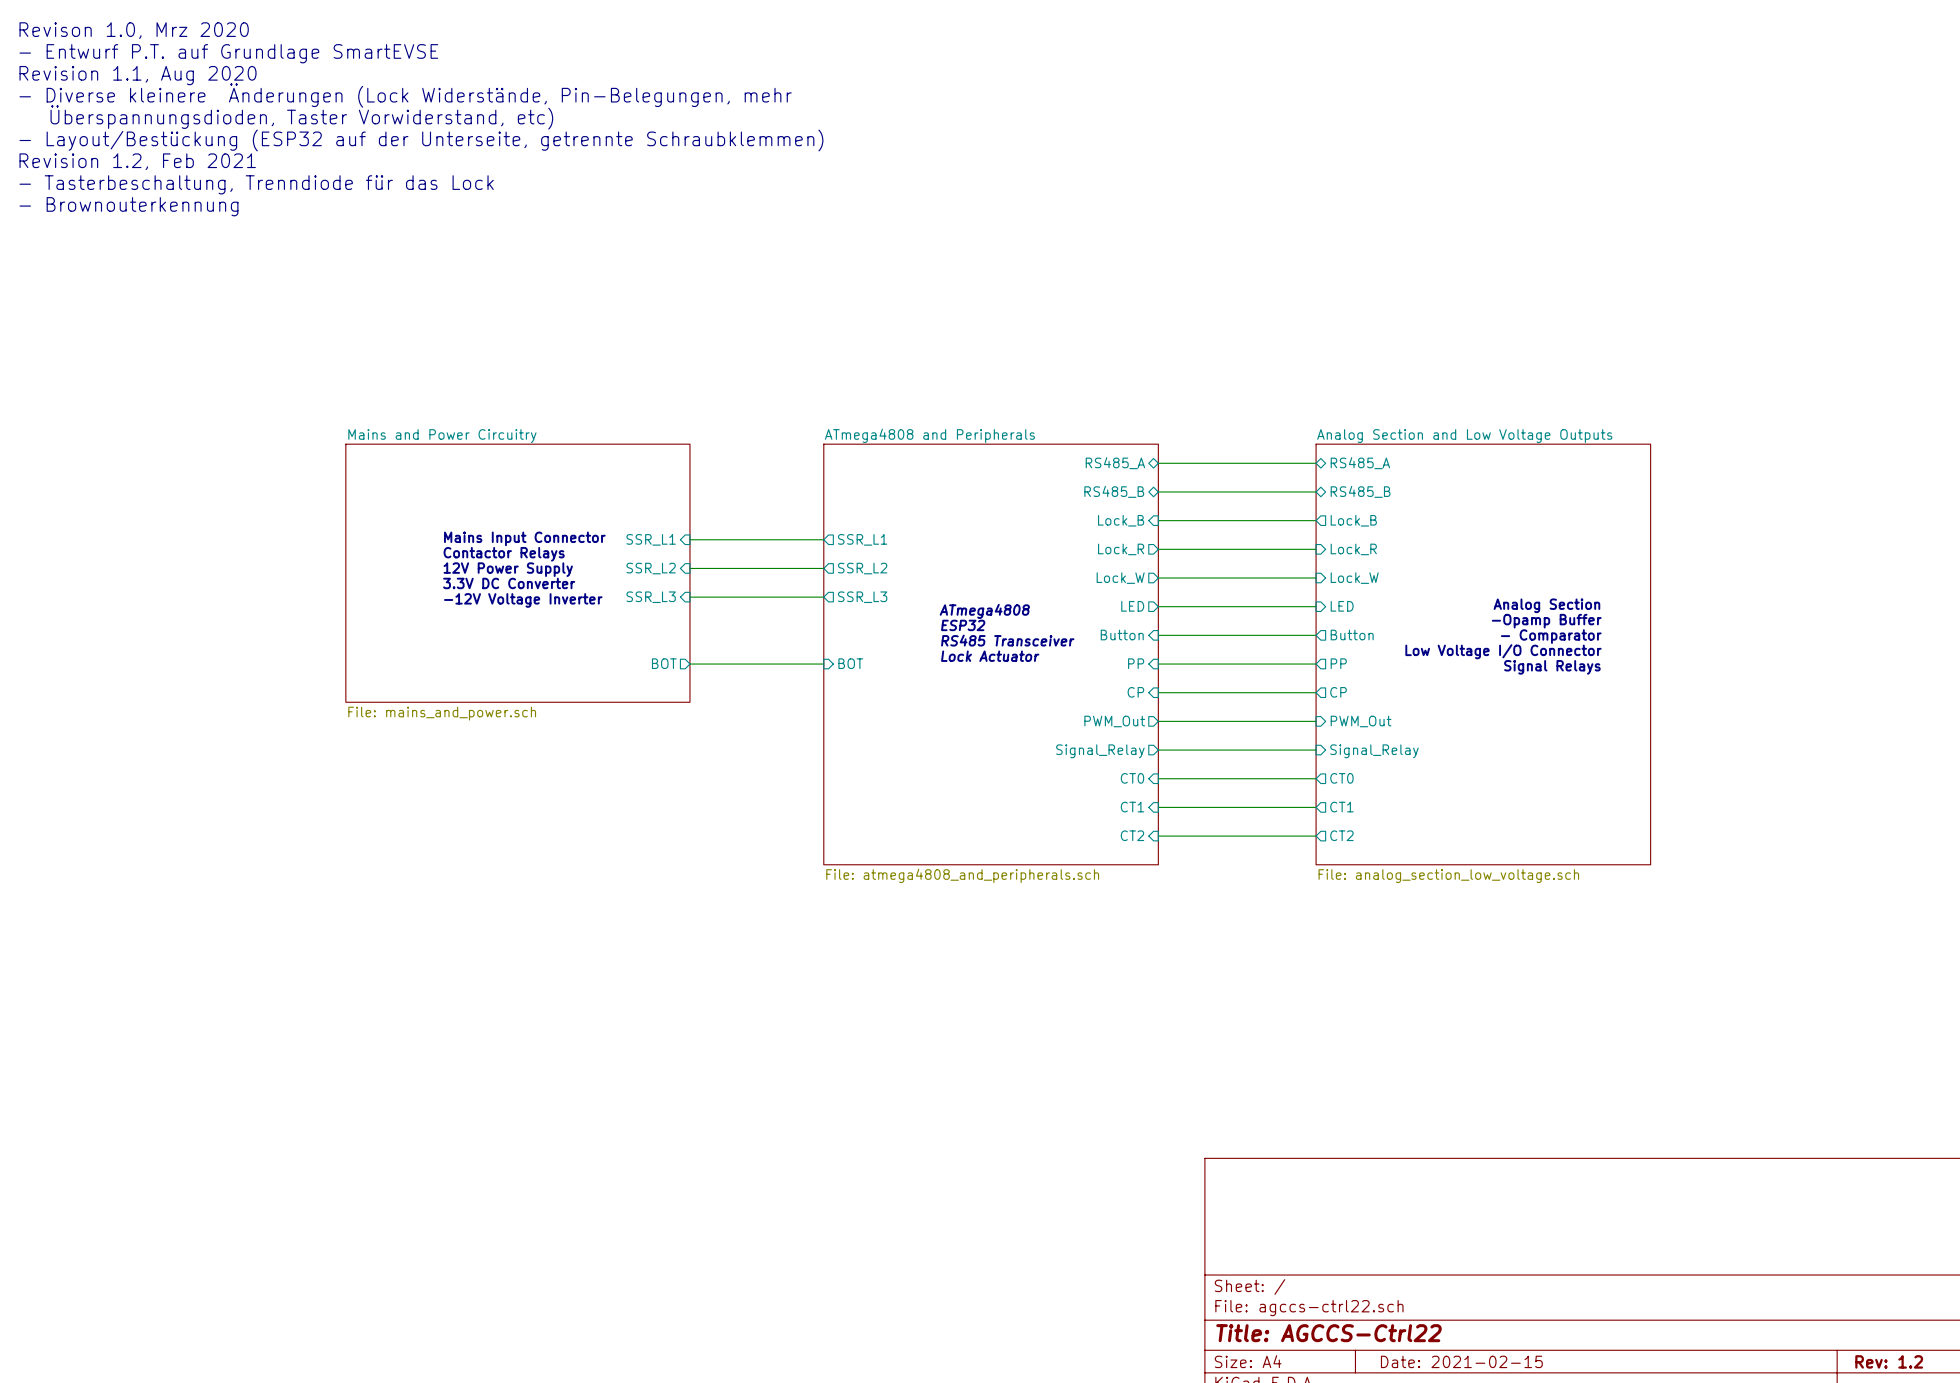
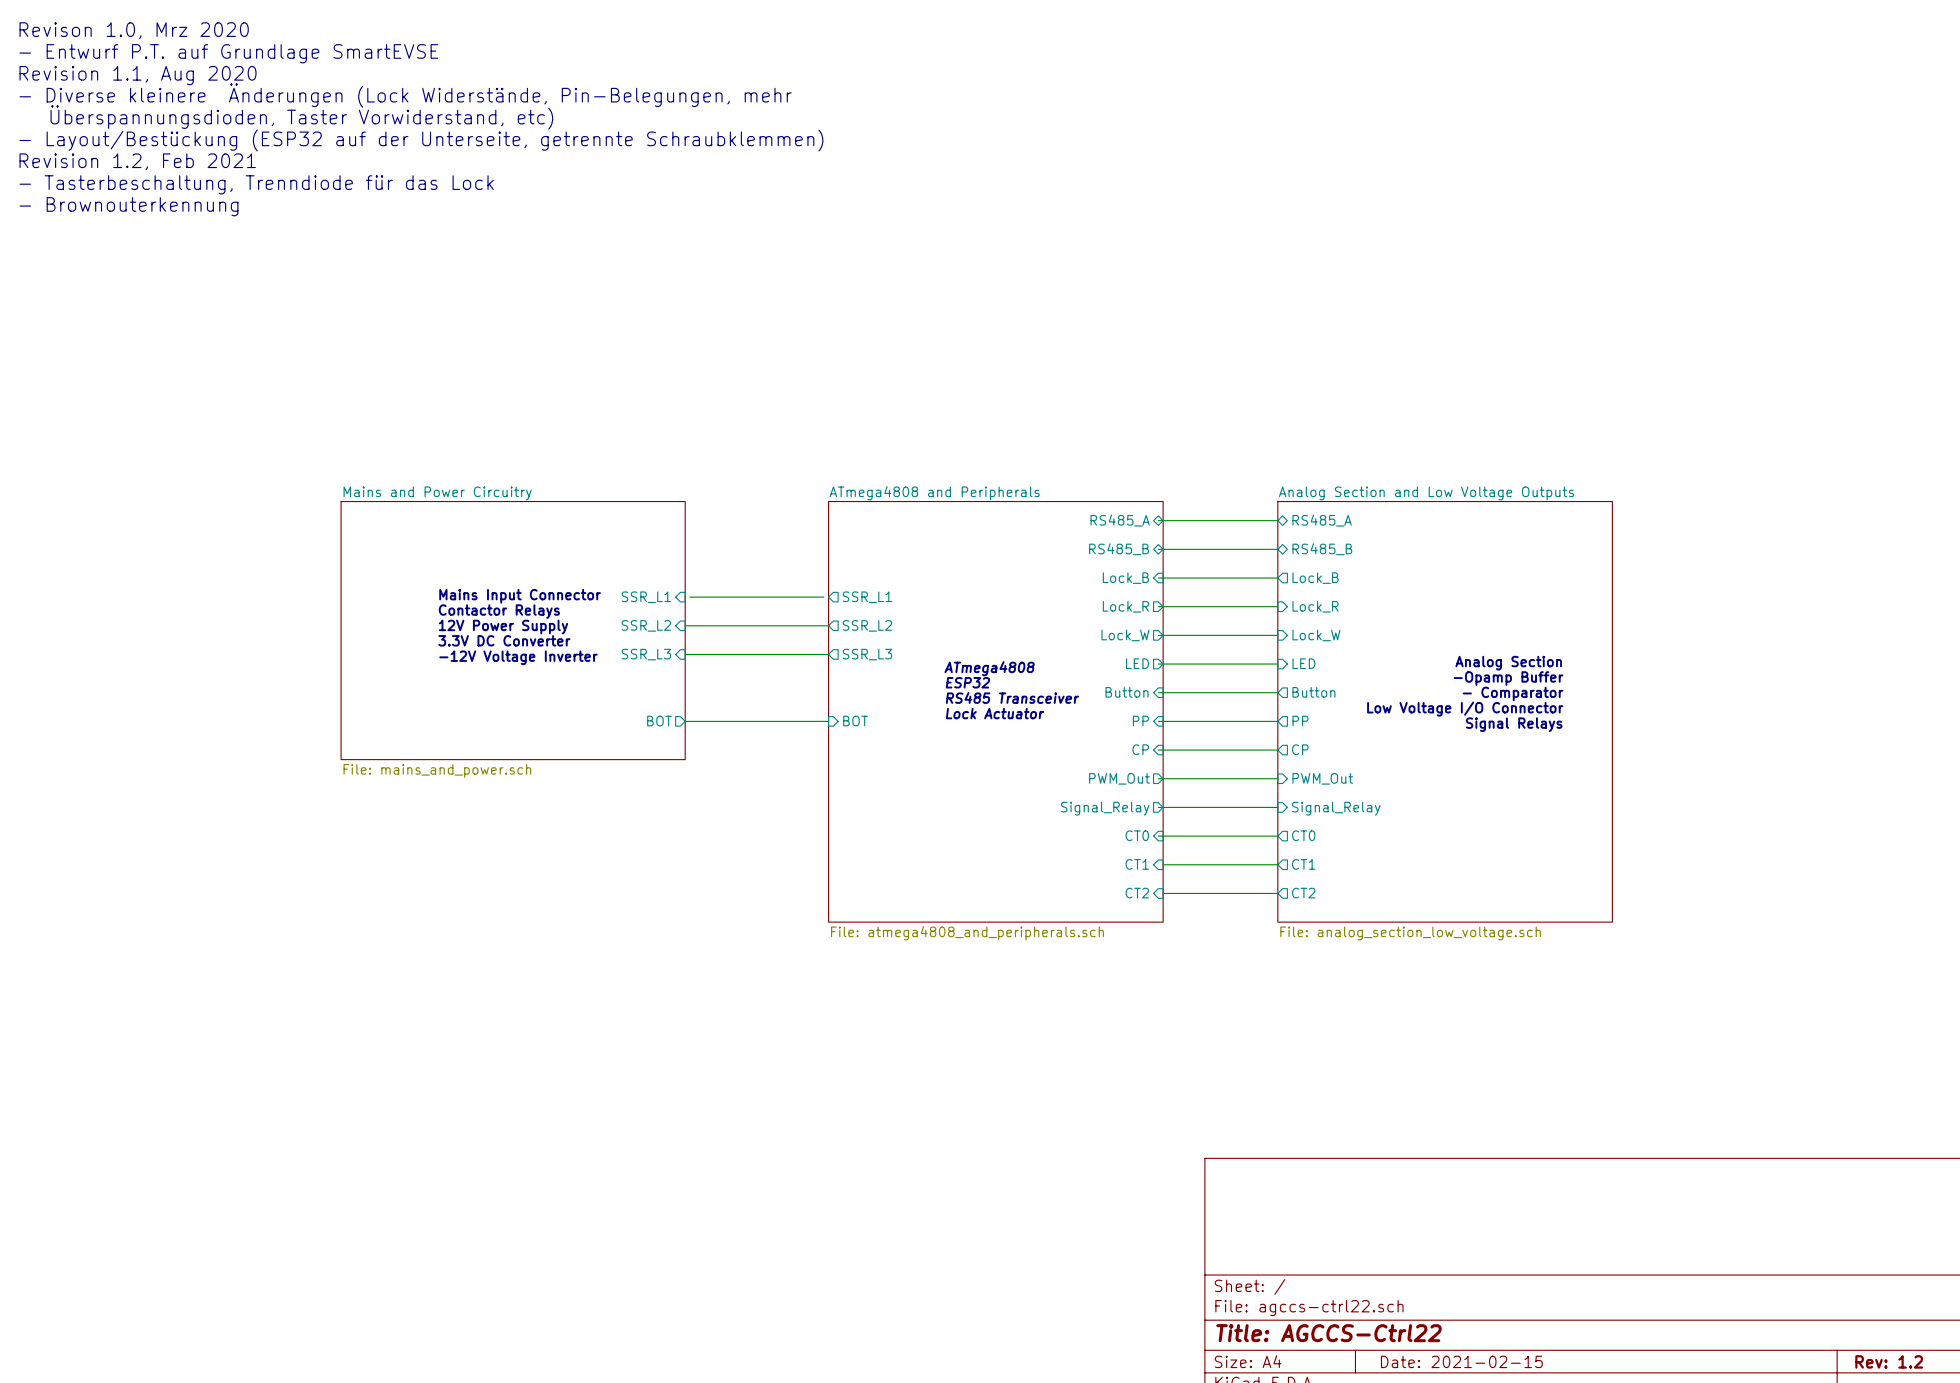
sheet pin position: RS485_A (1115, 463) -> RS485_A (1120, 520)
wire: (1158, 463) (1316, 463) -> none
sheet pin position: RS485_A (1360, 463) -> RS485_A (1322, 520)
sheet pin position: RS485_B (1114, 491) -> RS485_B (1119, 549)
wire: (1158, 491) (1316, 491) -> none
sheet pin position: RS485_B (1360, 491) -> RS485_B (1322, 549)
sheet pin position: Lock_B (1121, 520) -> Lock_B (1125, 578)
wire: (1277, 520) (1316, 520) -> none
sheet pin position: Lock_B (1353, 520) -> Lock_B (1315, 578)
text position: Mains Input Connector (524, 538) -> Mains Input Connector (520, 596)
sheet pin position: SSR_L1 (651, 539) -> SSR_L1 (646, 597)
wire: (689, 539) (823, 539) -> none
sheet pin position: SSR_L1 (862, 539) -> SSR_L1 (867, 597)
sheet pin position: Lock_R (1121, 549) -> Lock_R (1125, 606)
wire: (1277, 549) (1316, 549) -> none
sheet pin position: Lock_R (1353, 549) -> Lock_R (1315, 606)
text position: Contactor Relays (504, 554) -> Contactor Relays (499, 611)
sheet pin position: SSR_L2 (651, 568) -> SSR_L2 (646, 625)
wire: (689, 568) (823, 568) -> none
sheet pin position: SSR_L2 (862, 568) -> SSR_L2 (867, 625)
text position: 12V Power Supply (508, 569) -> 12V Power Supply (503, 627)
sheet Mains and Power Circuitry position: (517, 573) -> (513, 630)
sheet pin position: Lock_W (1120, 578) -> Lock_W (1125, 635)
wire: (1277, 578) (1316, 578) -> none
sheet pin position: Lock_W (1354, 578) -> Lock_W (1316, 635)
text position: 3.3V DC Converter (509, 583) -> 3.3V DC Converter (504, 640)
sheet pin position: SSR_L3 (651, 597) -> SSR_L3 (646, 654)
sheet pin position: SSR_L3 (862, 597) -> SSR_L3 (867, 654)
text position: -12V Voltage Inverter (523, 600) -> -12V Voltage Inverter (518, 657)
text position: Analog Section (1546, 605) -> Analog Section (1508, 663)
sheet pin position: LED (1132, 606) -> LED (1137, 663)
wire: (1277, 606) (1316, 606) -> none
sheet pin position: LED (1342, 606) -> LED (1303, 663)
text position: ATmega4808 (984, 611) -> ATmega4808 (989, 668)
text position: -Opamp Buffer (1546, 621) -> -Opamp Buffer (1508, 678)
wire: none -> (685, 625) (828, 625)
text position: ESP32 (963, 625) -> ESP32 (968, 682)
sheet pin position: Button (1122, 635) -> Button (1127, 692)
wire: (1277, 635) (1316, 635) -> none
sheet pin position: Button (1352, 635) -> Button (1313, 692)
text position: - Comparator (1551, 636) -> - Comparator (1513, 693)
text position: RS485 Transceiver (1007, 640) -> RS485 Transceiver (1012, 697)
text position: Low Voltage I/O Connector (1503, 651) -> Low Voltage I/O Connector (1465, 709)
wire: none -> (685, 654) (828, 654)
sheet ATmega4808 and Peripherals position: (991, 654) -> (995, 711)
sheet Analog Section and Low Voltage Outputs position: (1483, 654) -> (1445, 711)
text position: Lock Actuator (990, 656) -> Lock Actuator (995, 713)
sheet pin position: BOT (664, 663) -> BOT (659, 721)
sheet pin position: BOT (850, 663) -> BOT (855, 721)
sheet pin position: PP (1136, 663) -> PP (1140, 721)
sheet pin position: PP (1338, 663) -> PP (1300, 721)
wire: (689, 664) (823, 664) -> none
wire: (1277, 664) (1316, 664) -> none
text position: Signal Relays (1552, 667) -> Signal Relays (1514, 724)
sheet pin position: CP (1135, 692) -> CP (1140, 749)
wire: (1277, 692) (1316, 692) -> none
sheet pin position: CP (1338, 692) -> CP (1300, 749)
wire: none -> (685, 721) (828, 721)
sheet pin position: PWM_Out (1114, 721) -> PWM_Out (1119, 778)
wire: (1277, 721) (1316, 721) -> none
sheet pin position: PWM_Out (1361, 721) -> PWM_Out (1322, 778)
wire: (1277, 750) (1316, 750) -> none
sheet pin position: Signal_Relay (1100, 751) -> Signal_Relay (1105, 808)
sheet pin position: Signal_Relay (1374, 751) -> Signal_Relay (1336, 808)
sheet pin position: CT0 (1132, 778) -> CT0 (1137, 835)
wire: (1277, 778) (1316, 778) -> none
sheet pin position: CT0 (1341, 778) -> CT0 (1303, 835)
sheet pin position: CT1 (1132, 807) -> CT1 (1137, 864)
wire: (1277, 807) (1316, 807) -> none
sheet pin position: CT1 (1341, 807) -> CT1 (1303, 864)
sheet pin position: CT2 (1132, 835) -> CT2 (1137, 893)
sheet pin position: CT2 (1341, 835) -> CT2 (1303, 893)
wire: (1277, 836) (1316, 836) -> none
wire: none -> (1163, 864) (1277, 864)
wire: none -> (1163, 893) (1277, 893)

